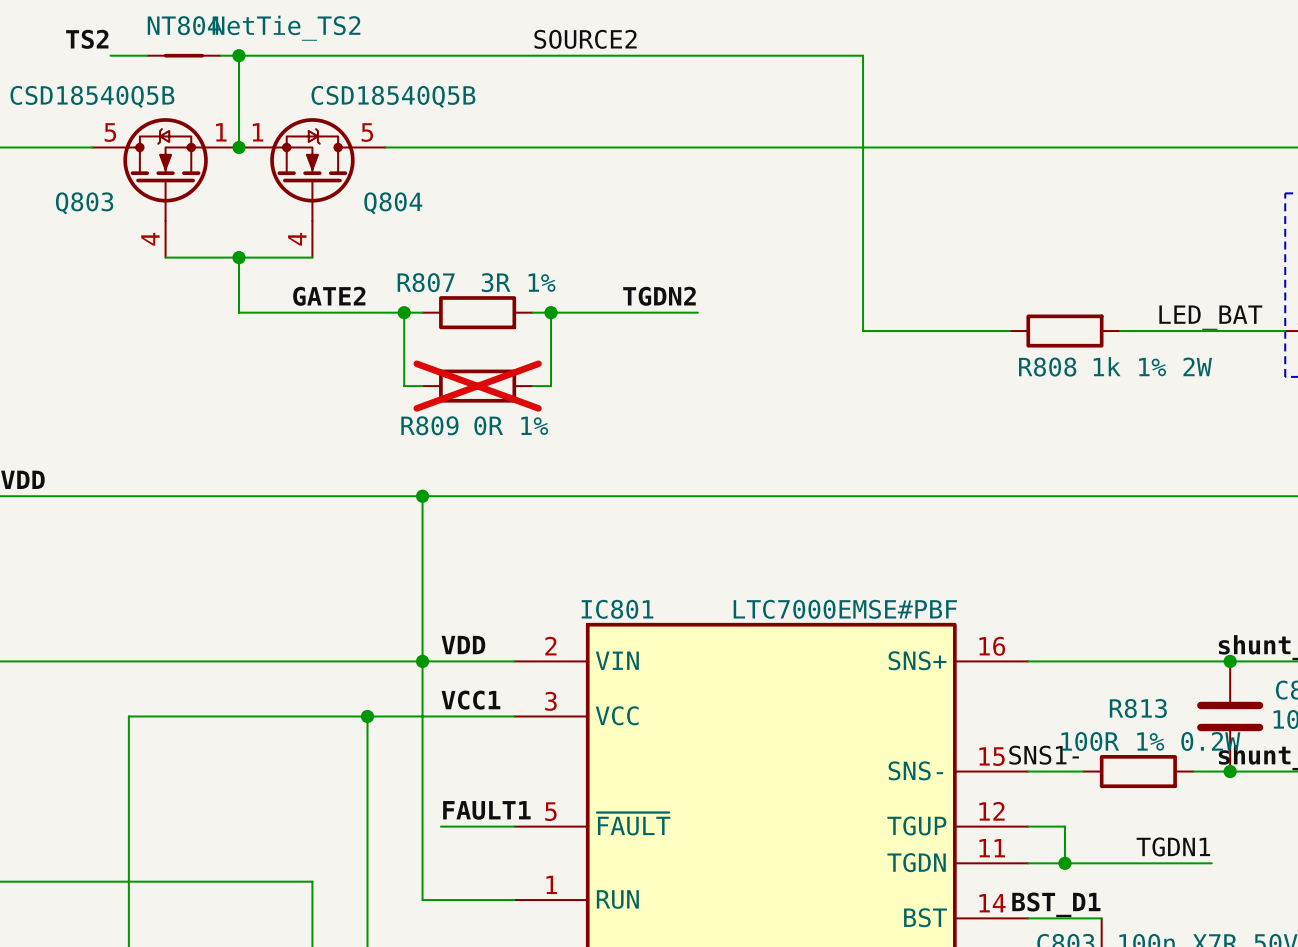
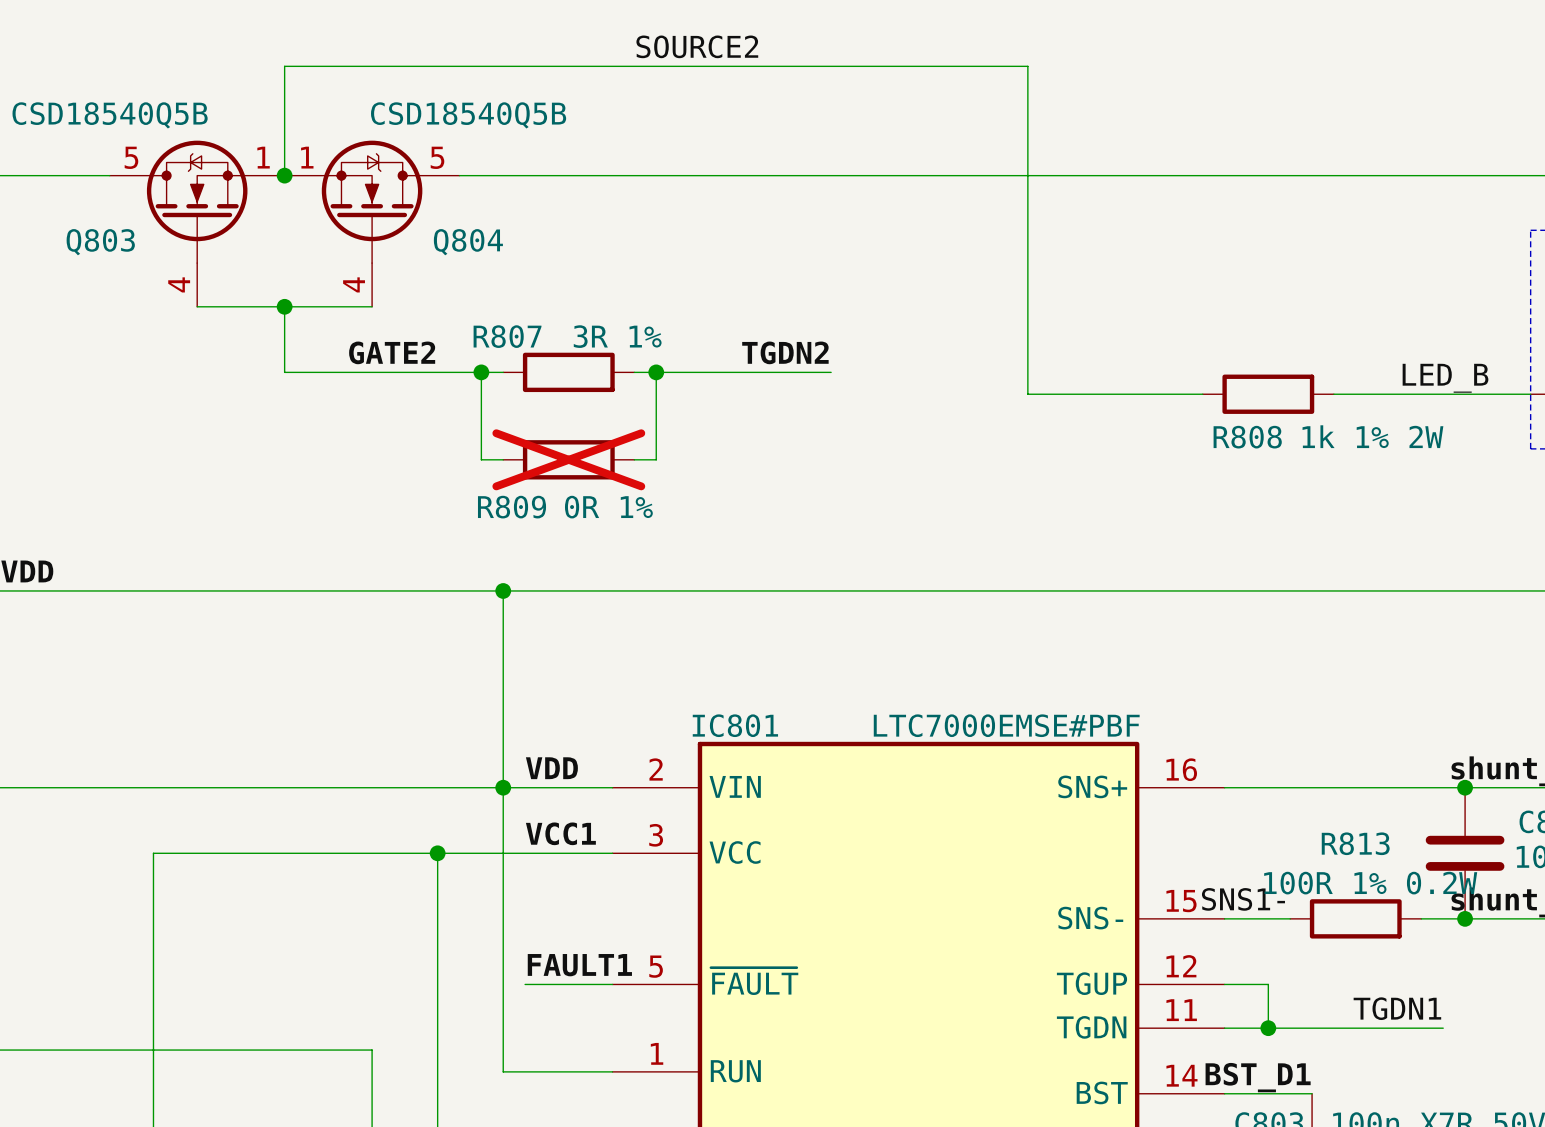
label: TS2 (87, 39) -> none
wire: (110, 55) (147, 55) -> none
NT804: NetTie_TS2 (183, 55) -> none
wire: (220, 55) (238, 55) -> none
junction: (238, 55) -> none
label: LED_BAT (1210, 317) -> LED_B (1445, 378)

